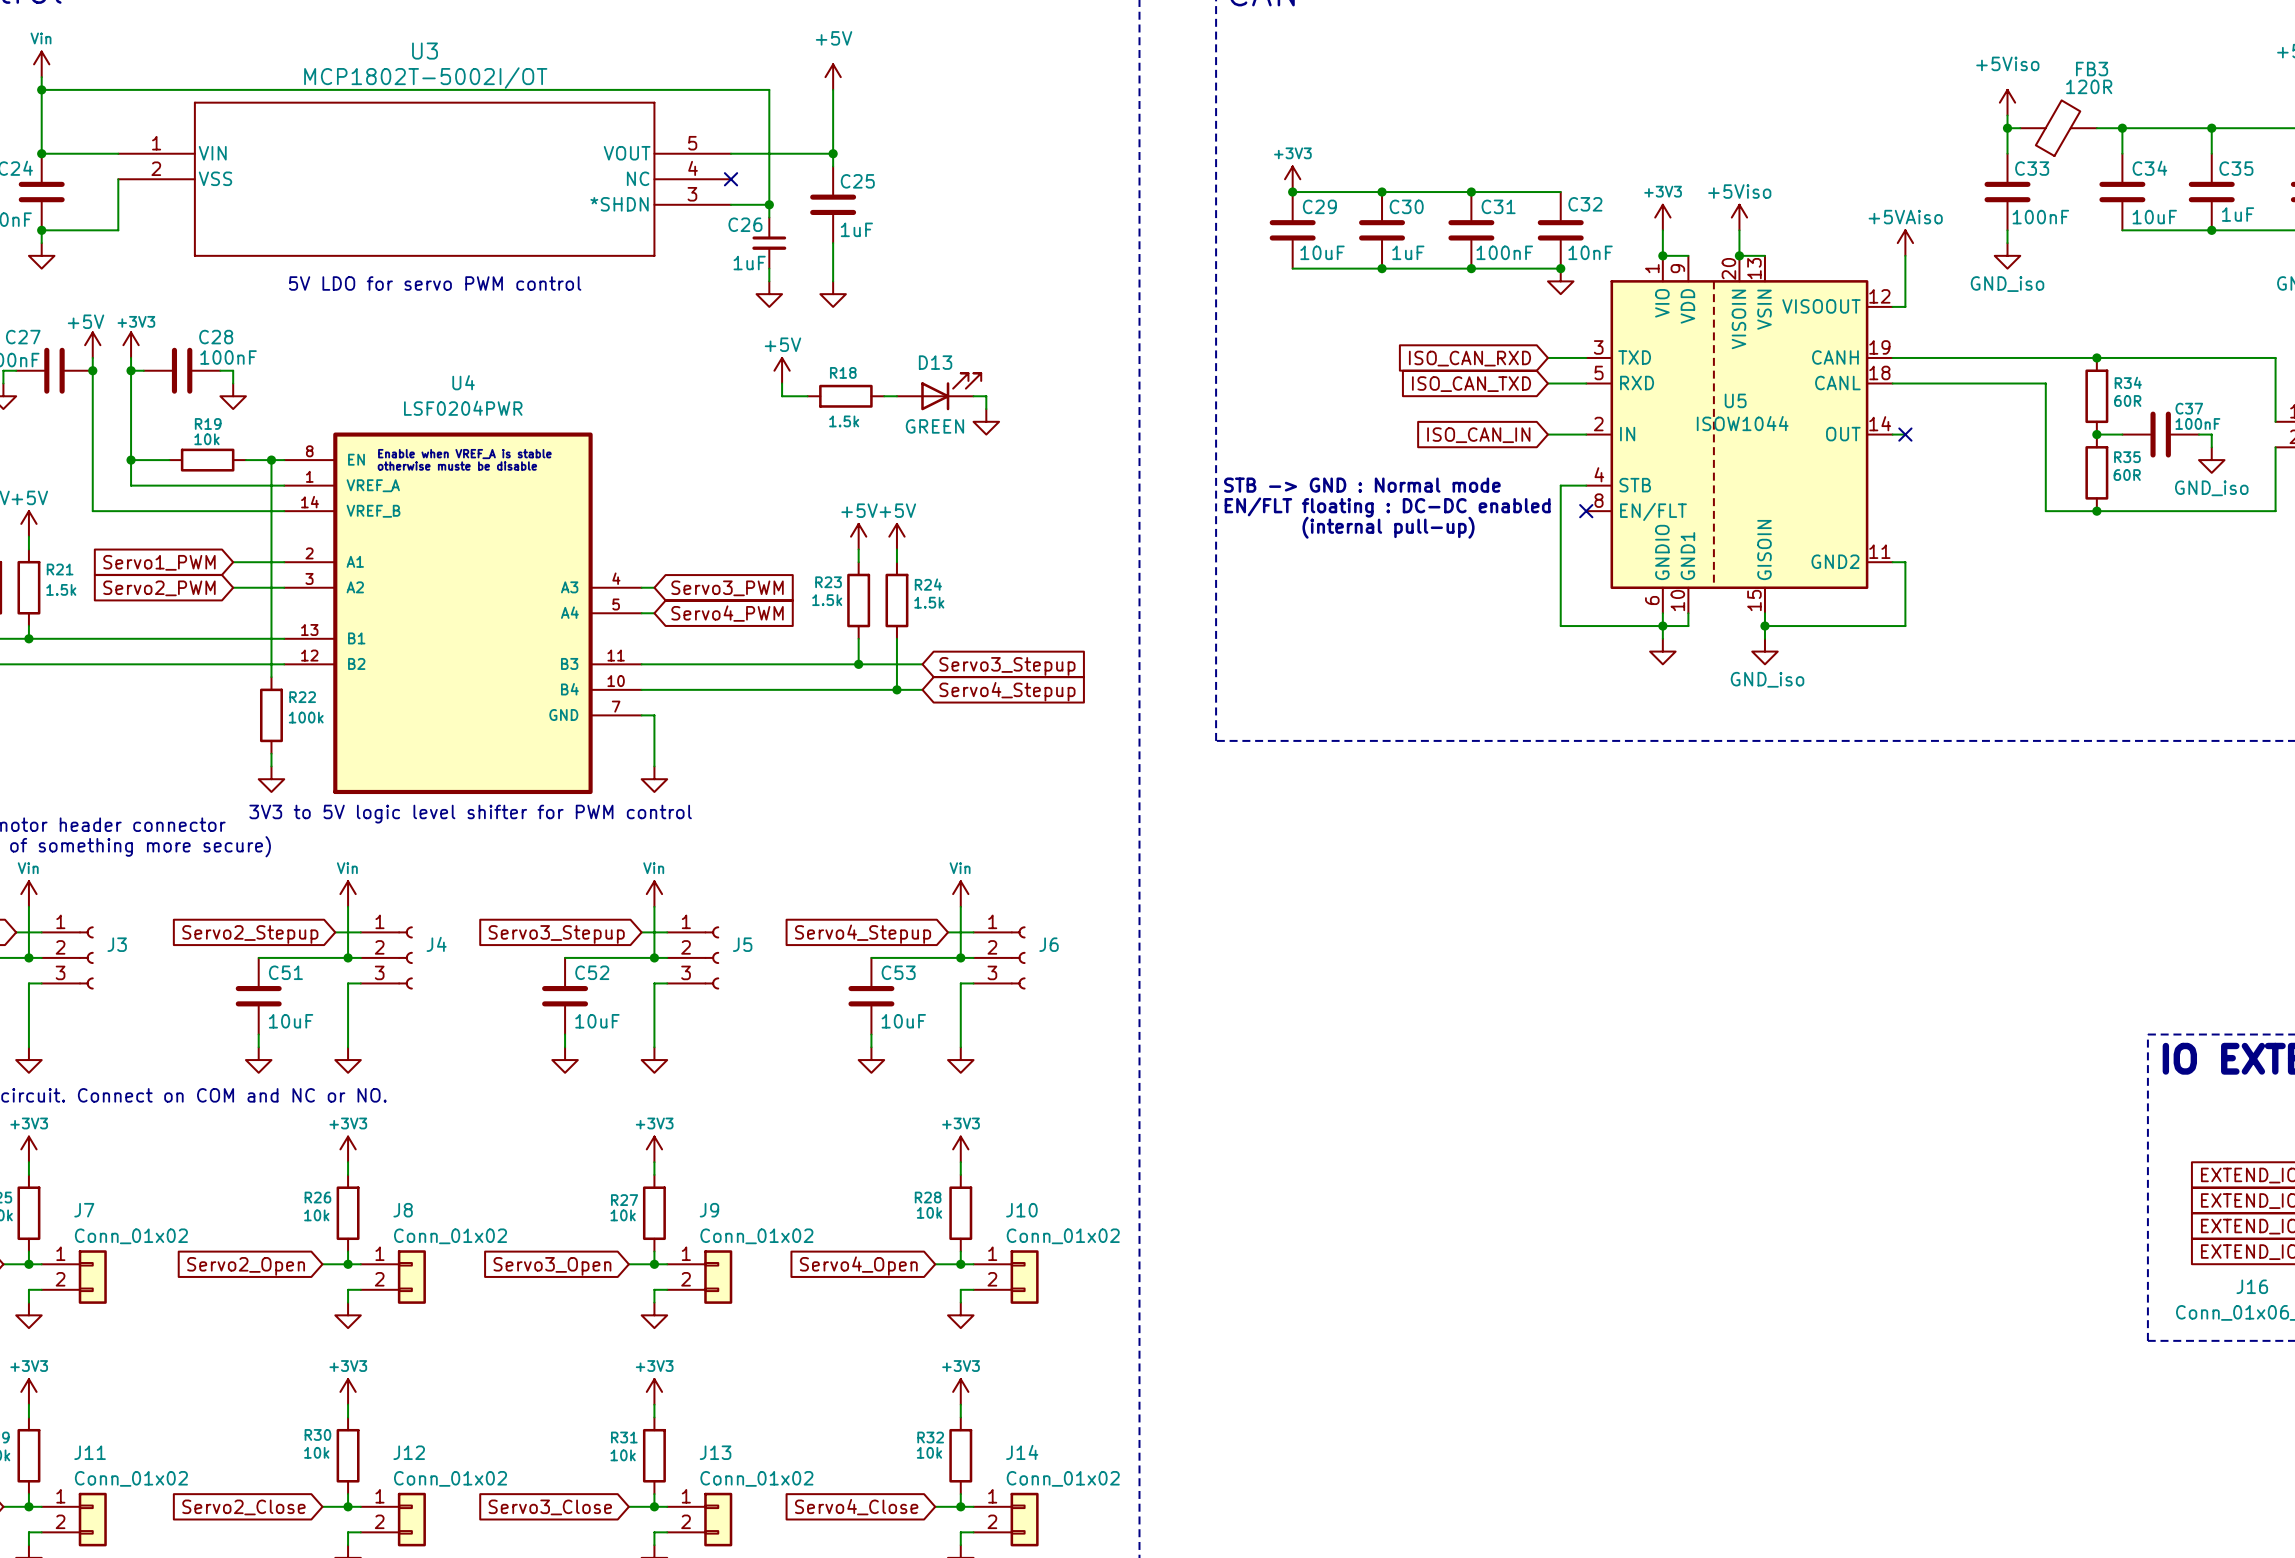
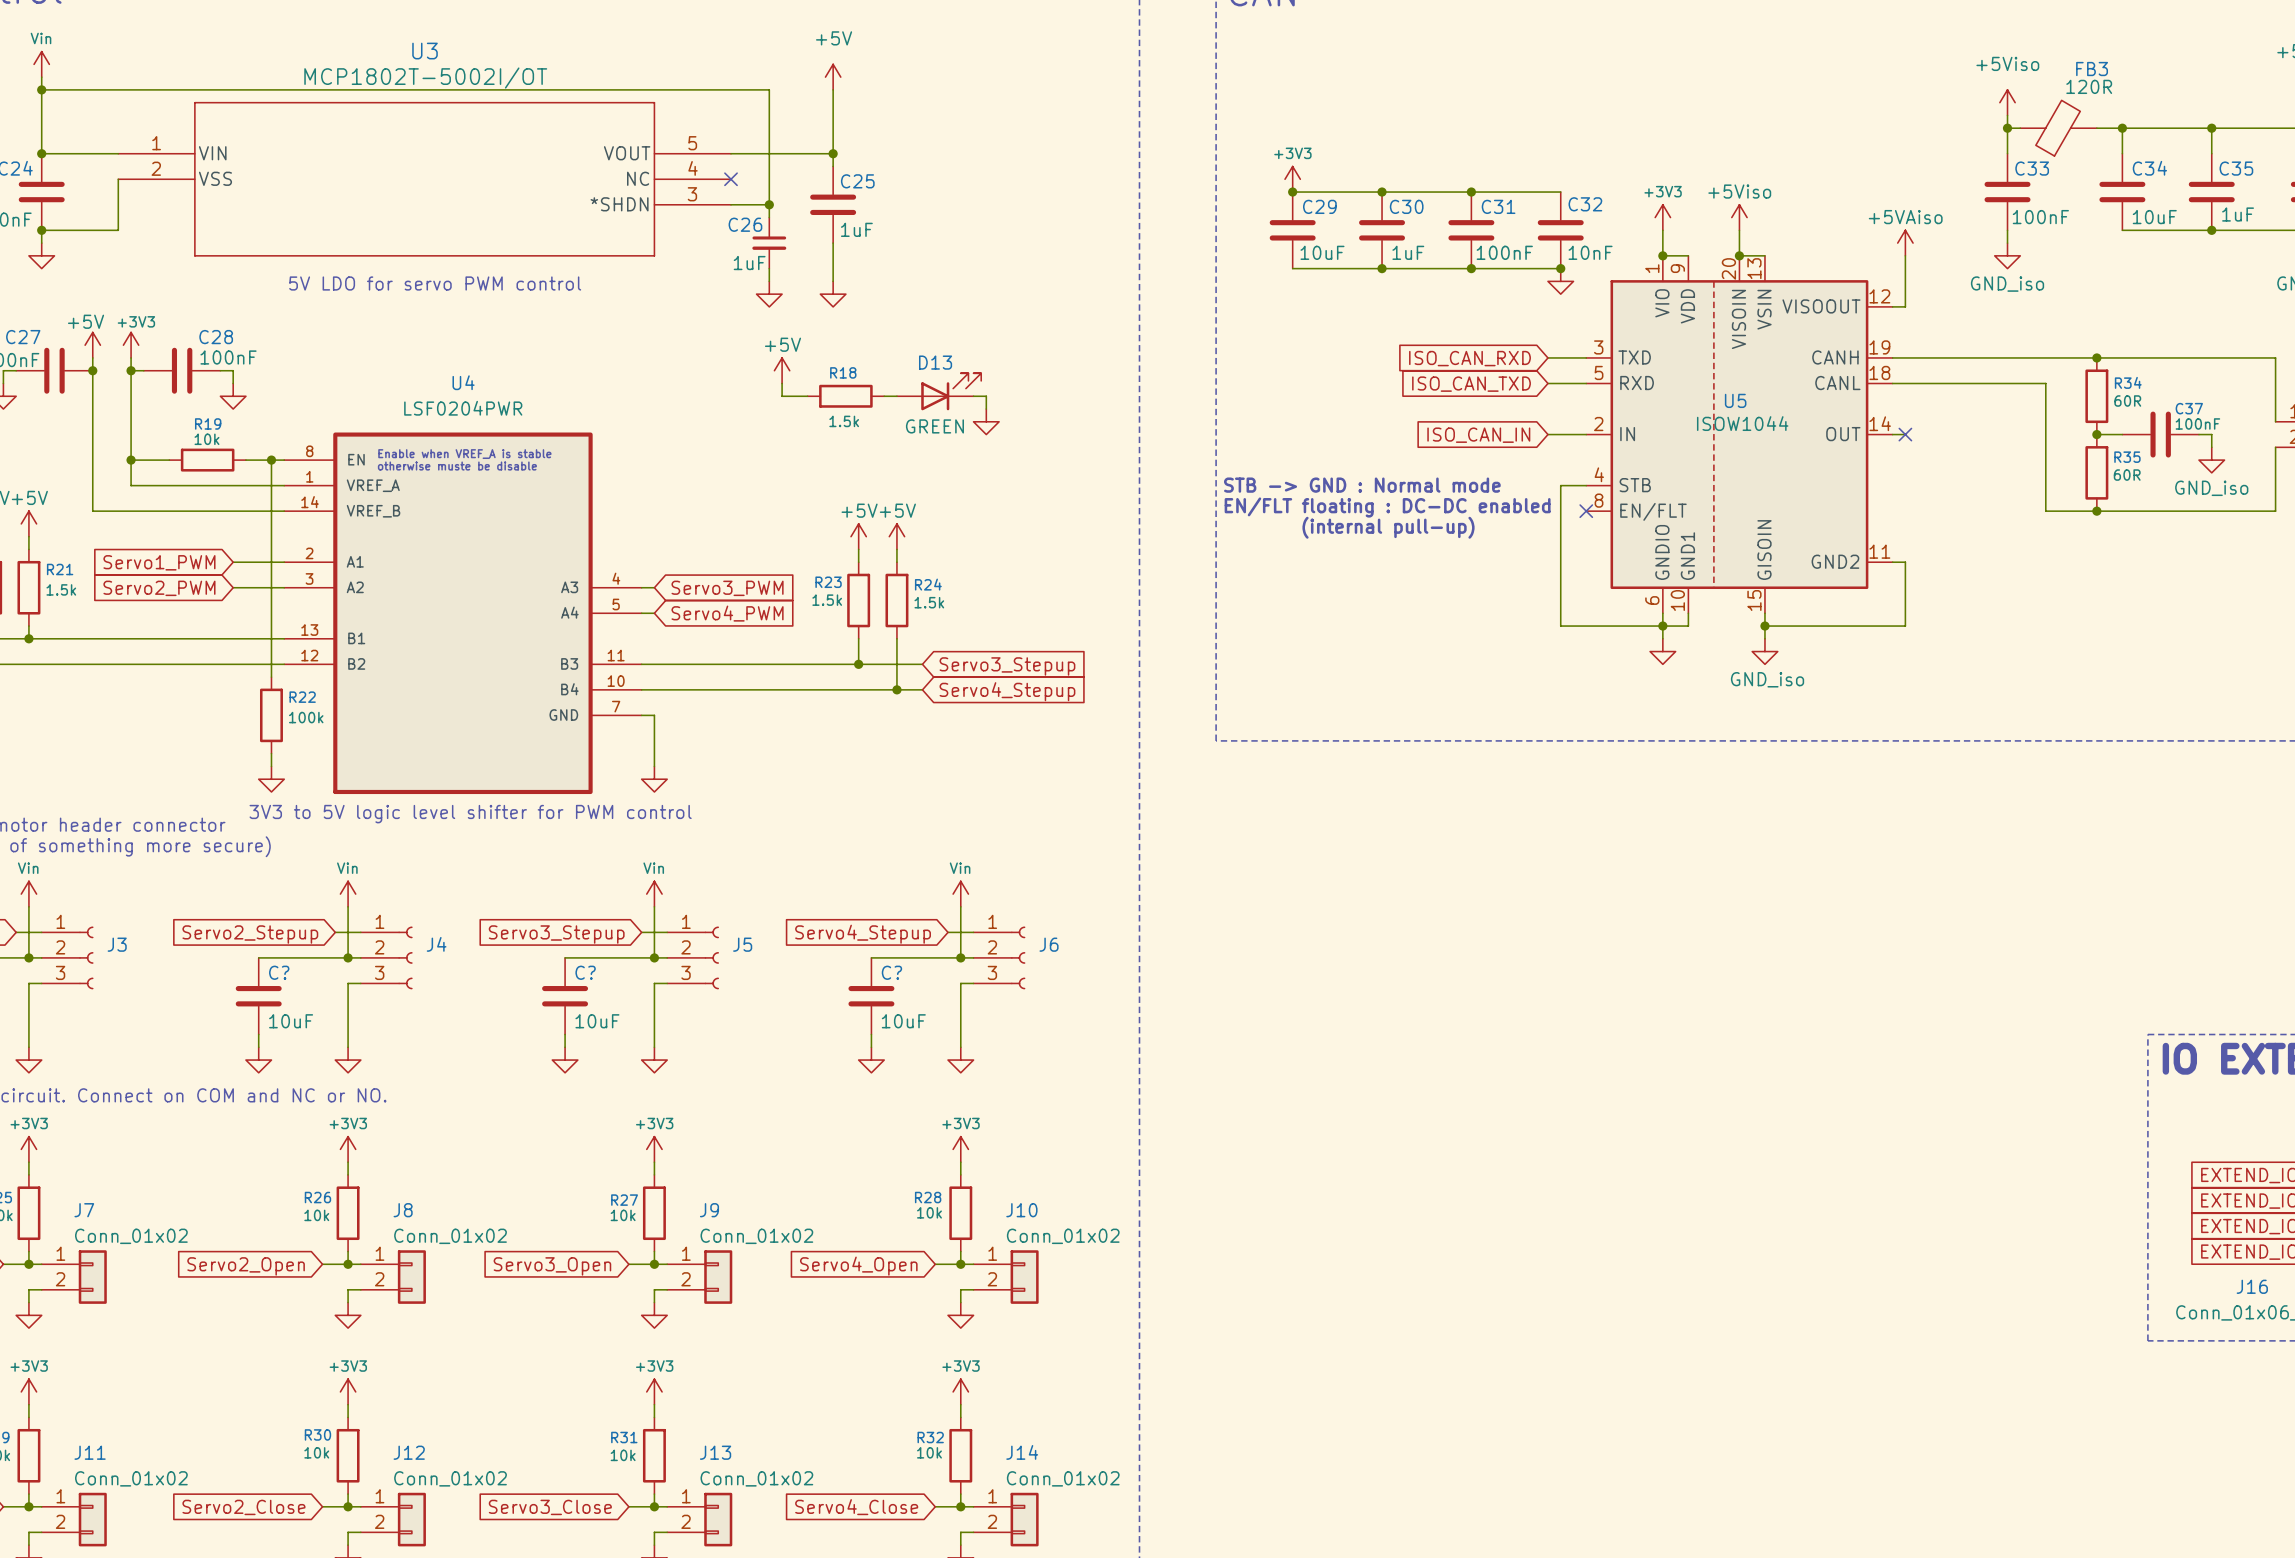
C51 name: C51 (285, 972) -> C? (279, 972)
C52 name: C52 (592, 972) -> C? (585, 972)
C53 name: C53 (898, 972) -> C? (891, 972)

